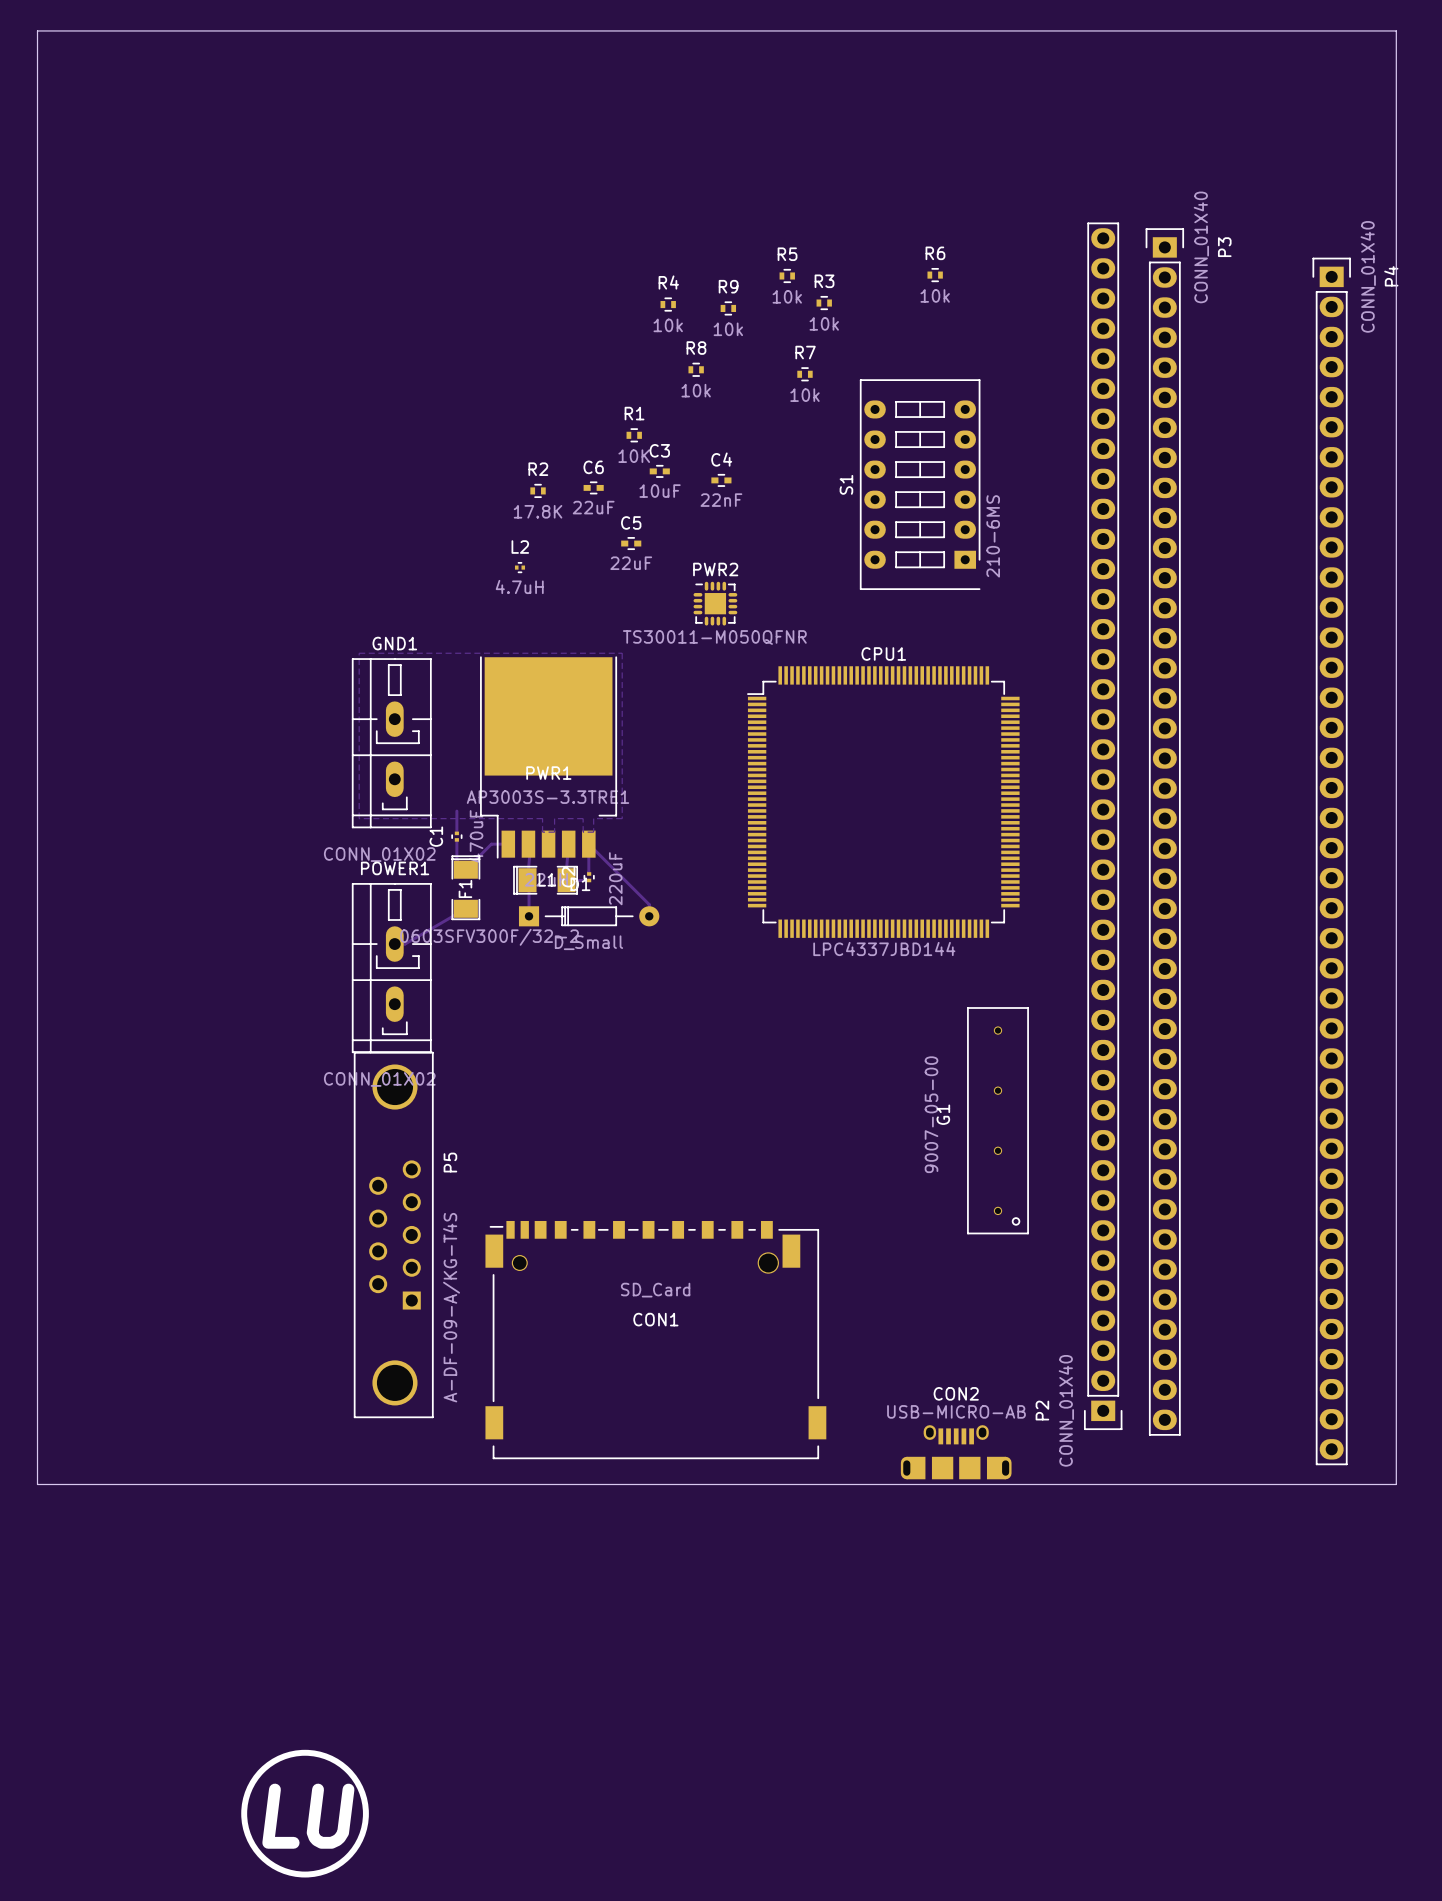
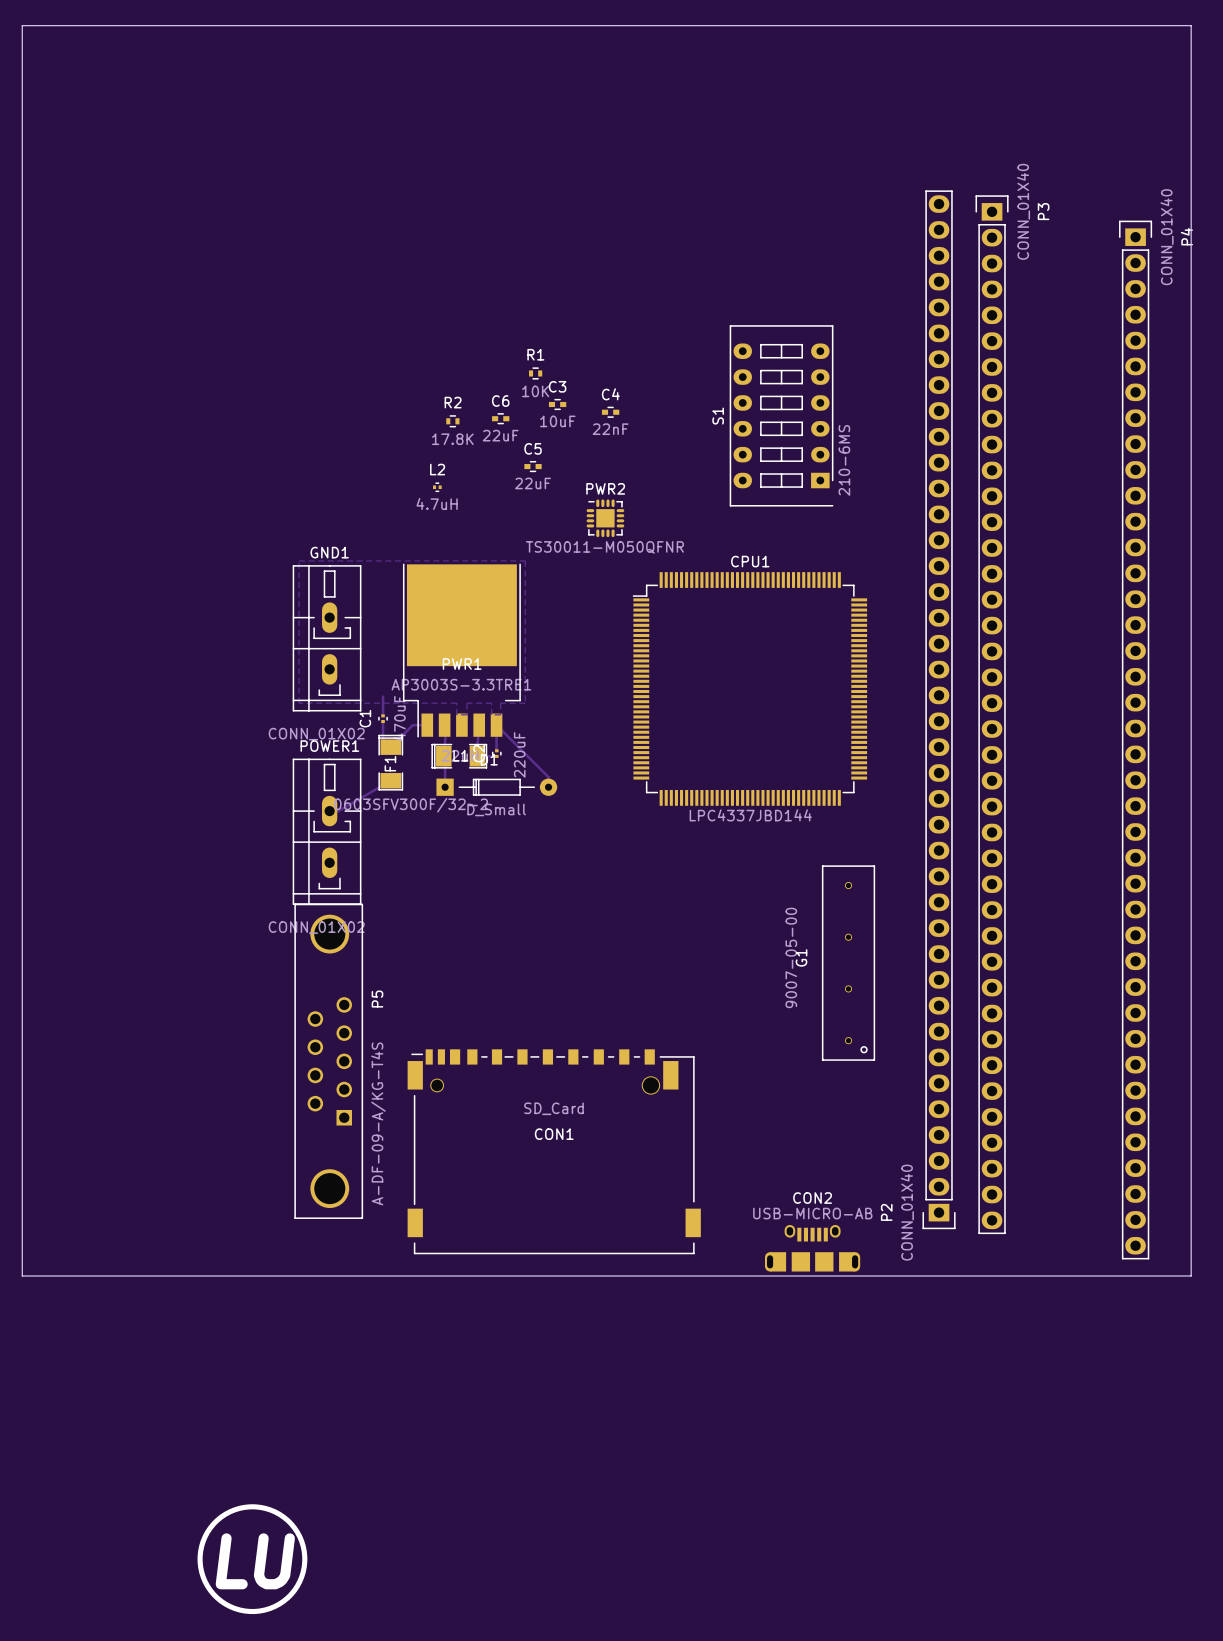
R5: 10k (787, 275) -> none
R6: 10k (935, 275) -> none
R3: 10k (824, 303) -> none
R4: 10k (668, 304) -> none
R9: 10k (728, 308) -> none
R8: 10k (696, 369) -> none
R7: 10k (804, 374) -> none

